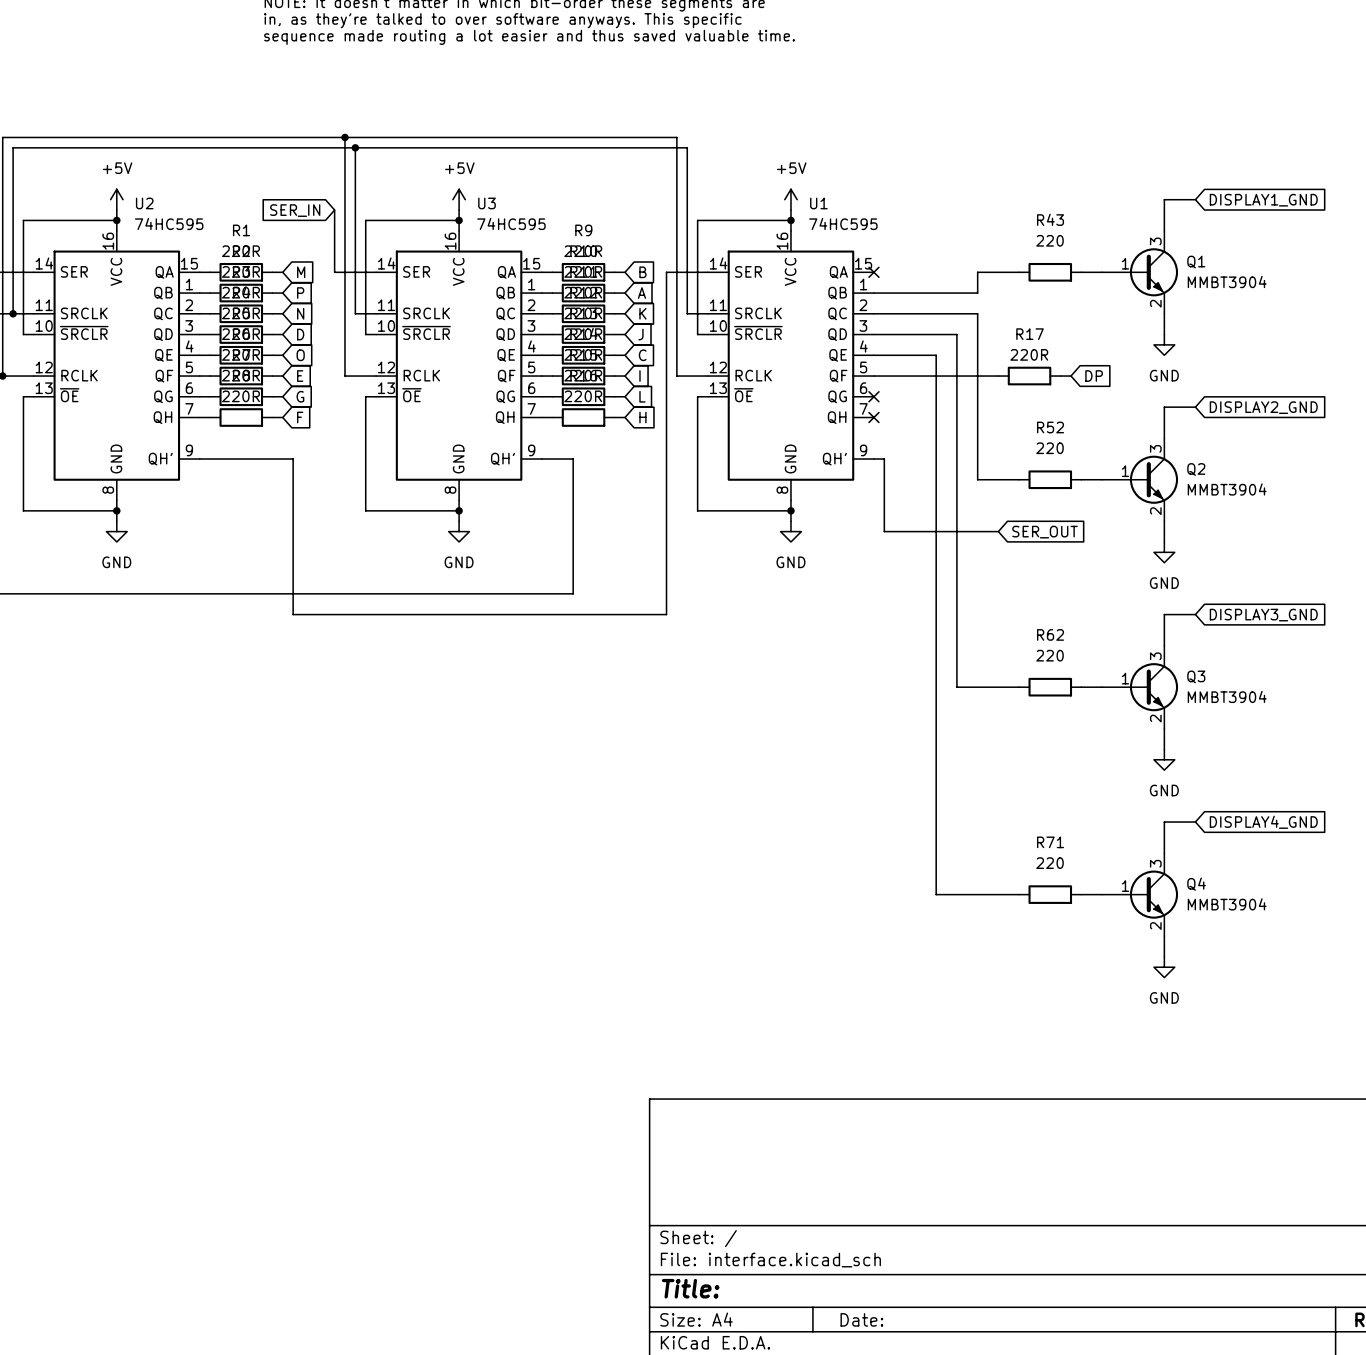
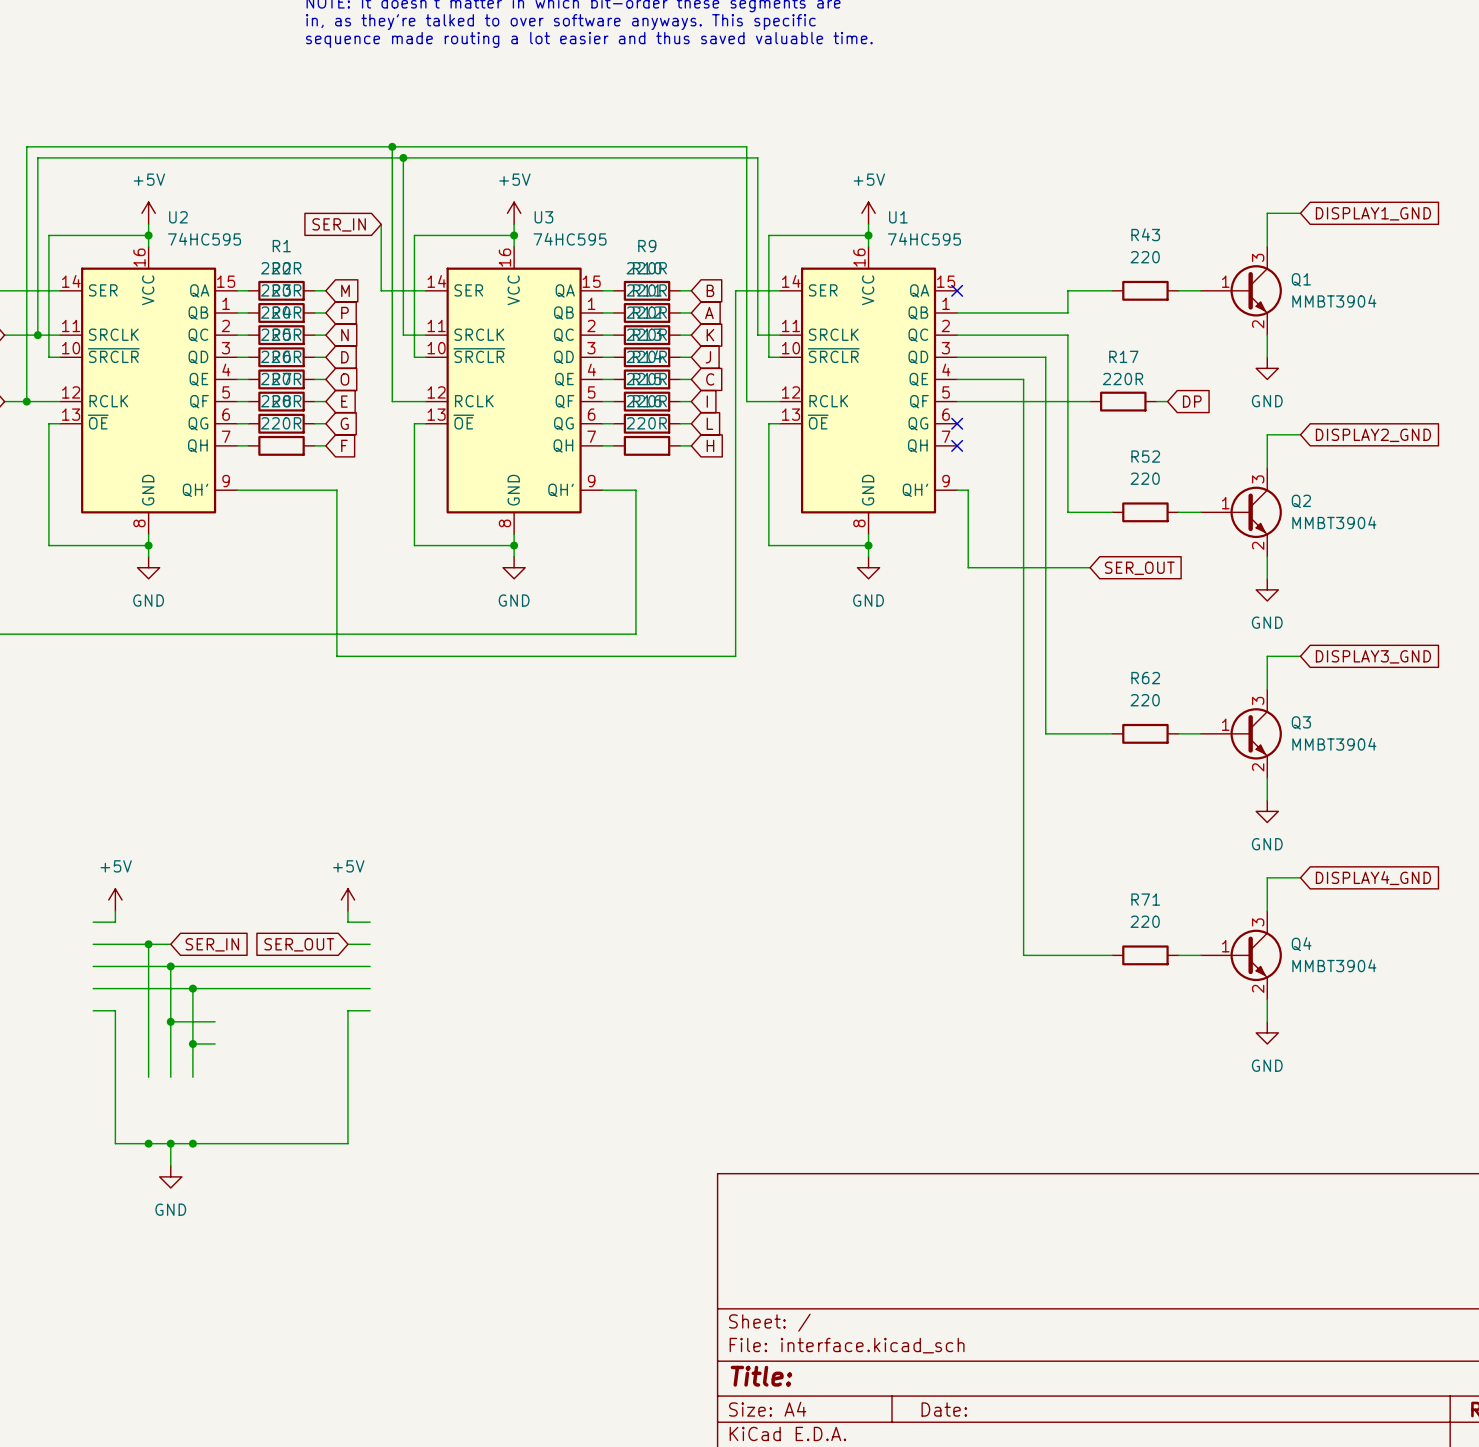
power symbol: none -> +5V (115, 900)
power symbol: none -> +5V (347, 900)
wire: none -> (115, 911) (115, 922) (93, 922)
wire: none -> (347, 911) (347, 922) (370, 922)
wire: none -> (93, 944) (170, 944)
wire: none -> (148, 944) (148, 1077)
junction: none -> (148, 944)
global label: none -> SER_IN (212, 944)
global label: none -> SER_OUT (299, 944)
wire: none -> (347, 944) (370, 944)
wire: none -> (93, 966) (370, 966)
wire: none -> (170, 966) (170, 1077)
junction: none -> (170, 966)
wire: none -> (93, 988) (370, 988)
wire: none -> (192, 988) (192, 1077)
junction: none -> (192, 988)
wire: none -> (93, 1010) (115, 1010) (115, 1143) (347, 1143) (347, 1010) (370, 1010)
wire: none -> (170, 1021) (215, 1021)
junction: none -> (170, 1021)
wire: none -> (192, 1043) (215, 1043)
junction: none -> (192, 1043)
junction: none -> (148, 1143)
wire: none -> (170, 1143) (170, 1165)
junction: none -> (170, 1143)
junction: none -> (192, 1143)
power symbol: none -> GND (170, 1176)

